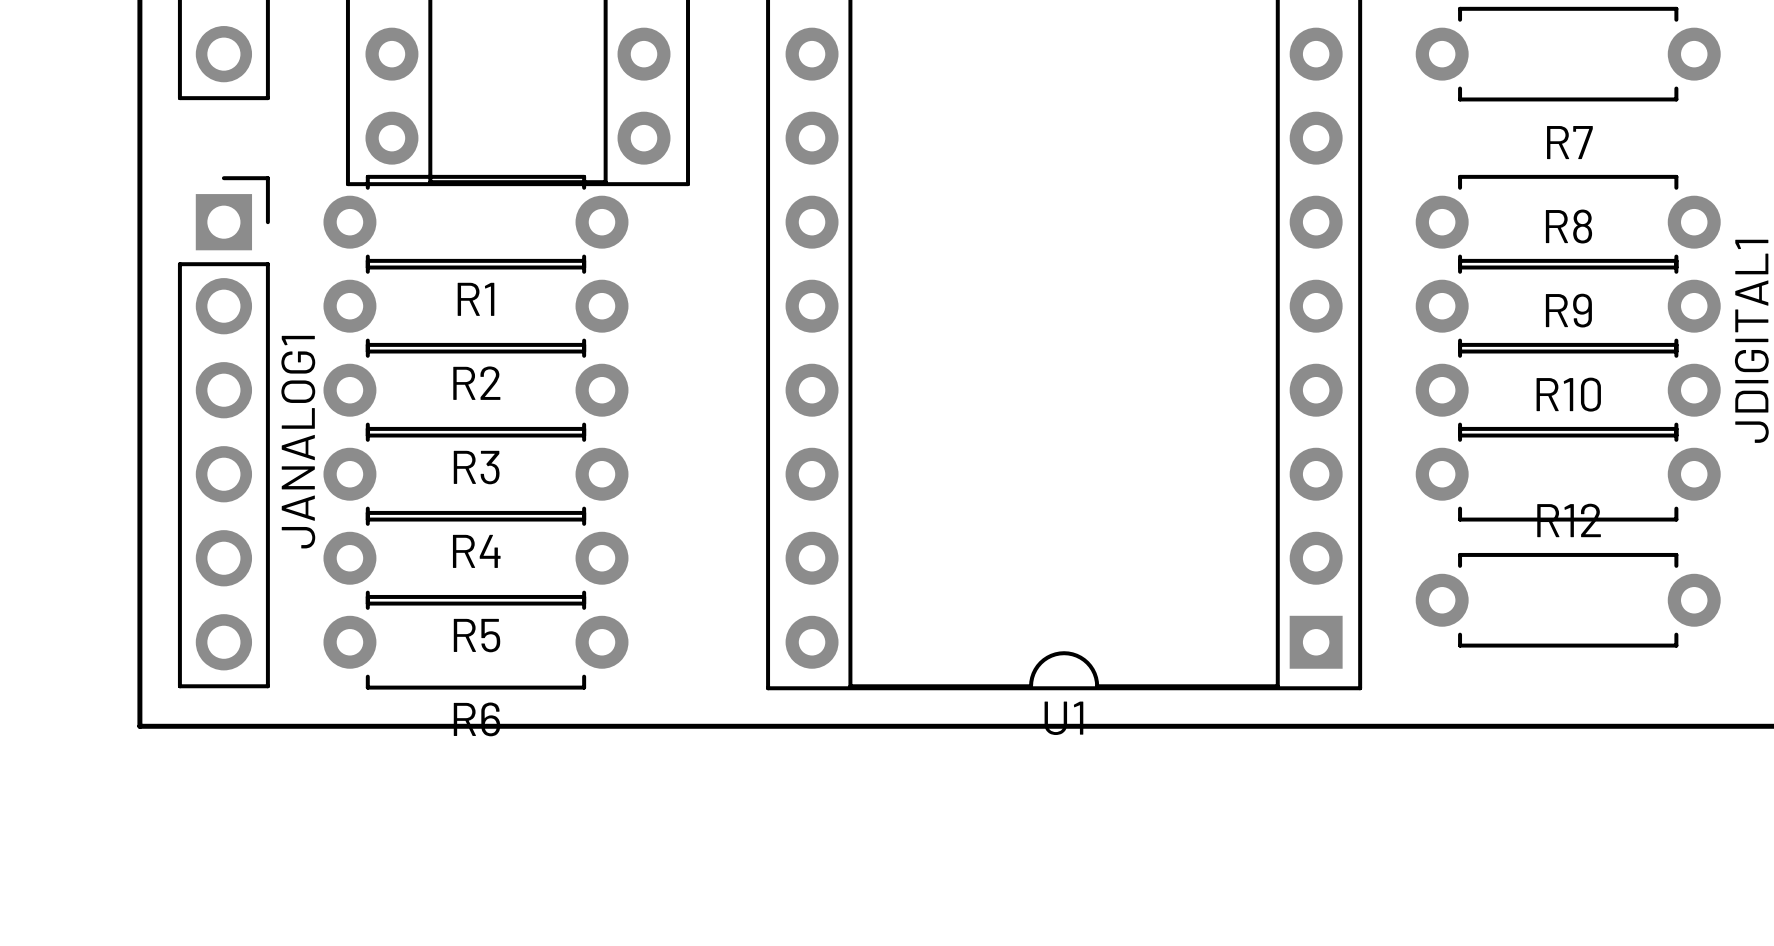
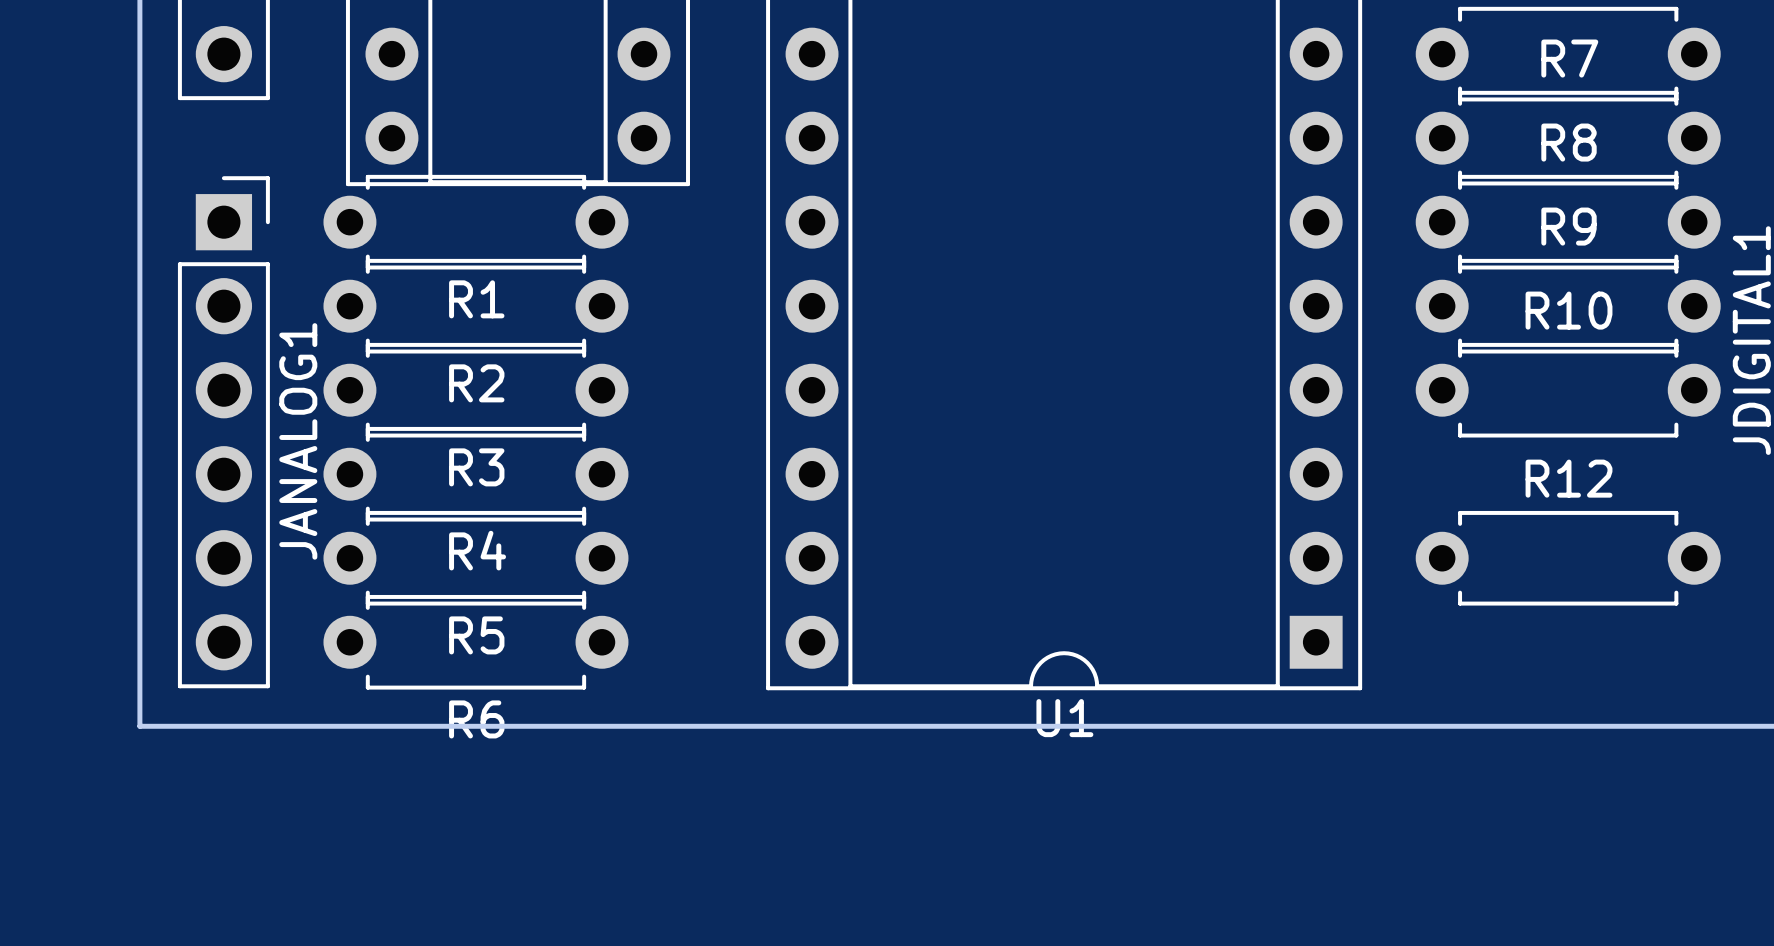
R7: none -> (1568, 138)
R7 name: R7 (1569, 142) -> R8 (1569, 142)
R8 name: R8 (1568, 226) -> R9 (1569, 226)
R9 name: R9 (1568, 310) -> R10 (1569, 310)
R10: (1568, 474) -> none
R12 position: (1568, 600) -> (1568, 558)

